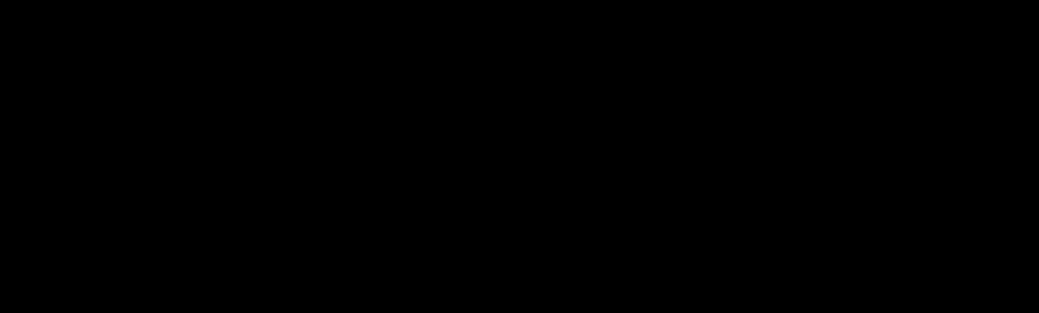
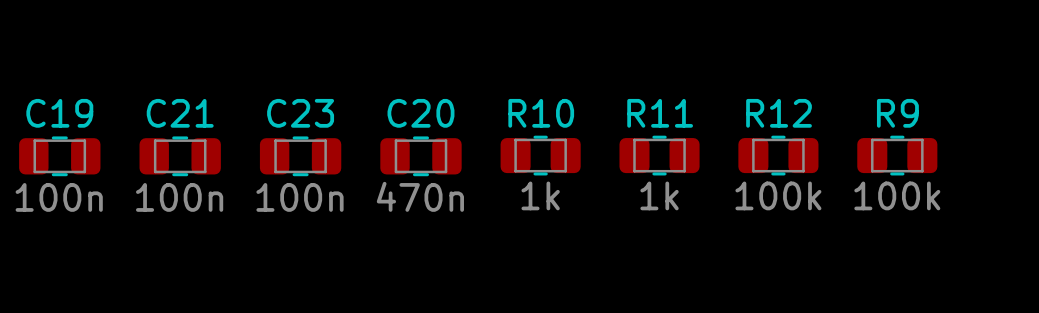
R10: none -> 1k (540, 155)
R11: none -> 1k (659, 155)
R12: none -> 100k (778, 155)
R9: none -> 100k (897, 155)
C19: none -> 100n (59, 156)
C21: none -> 100n (180, 156)
C23: none -> 100n (300, 156)
C20: none -> 470n (420, 156)

